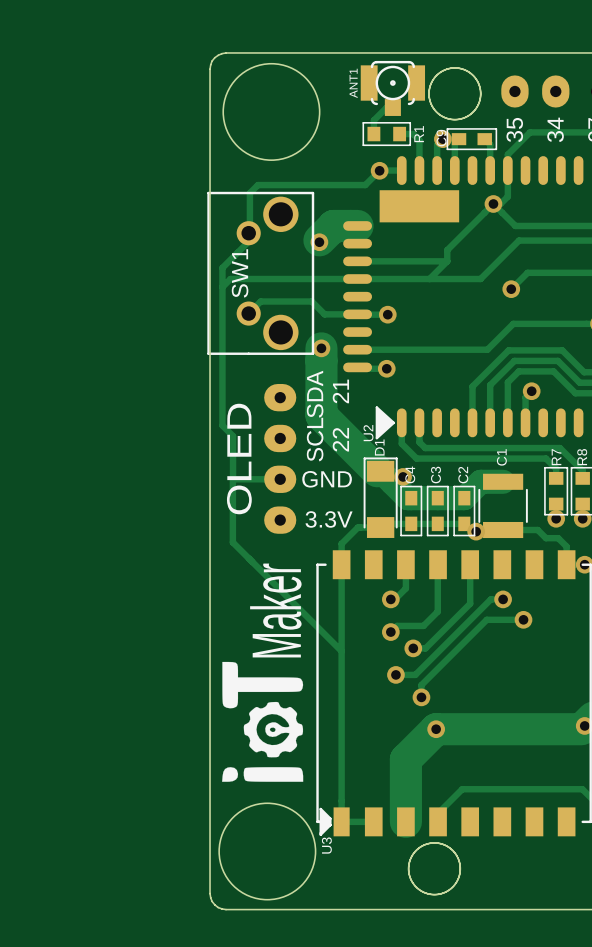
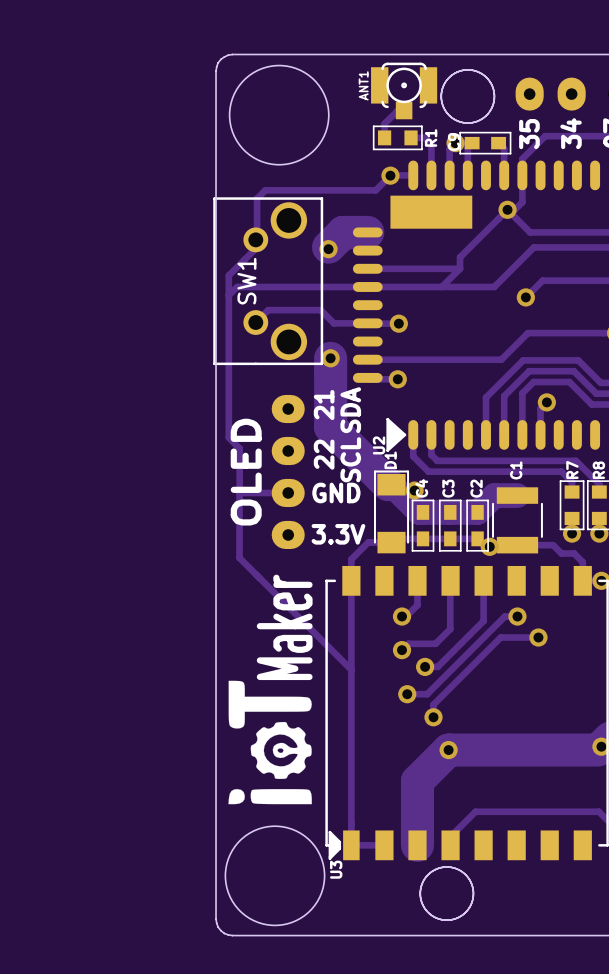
text: 21 (340, 391) -> SDA (350, 410)
text: SDA (315, 394) -> 21 (324, 405)
text: SCL (315, 439) -> 22 (324, 454)
text: 22 (340, 439) -> SCL (350, 459)

